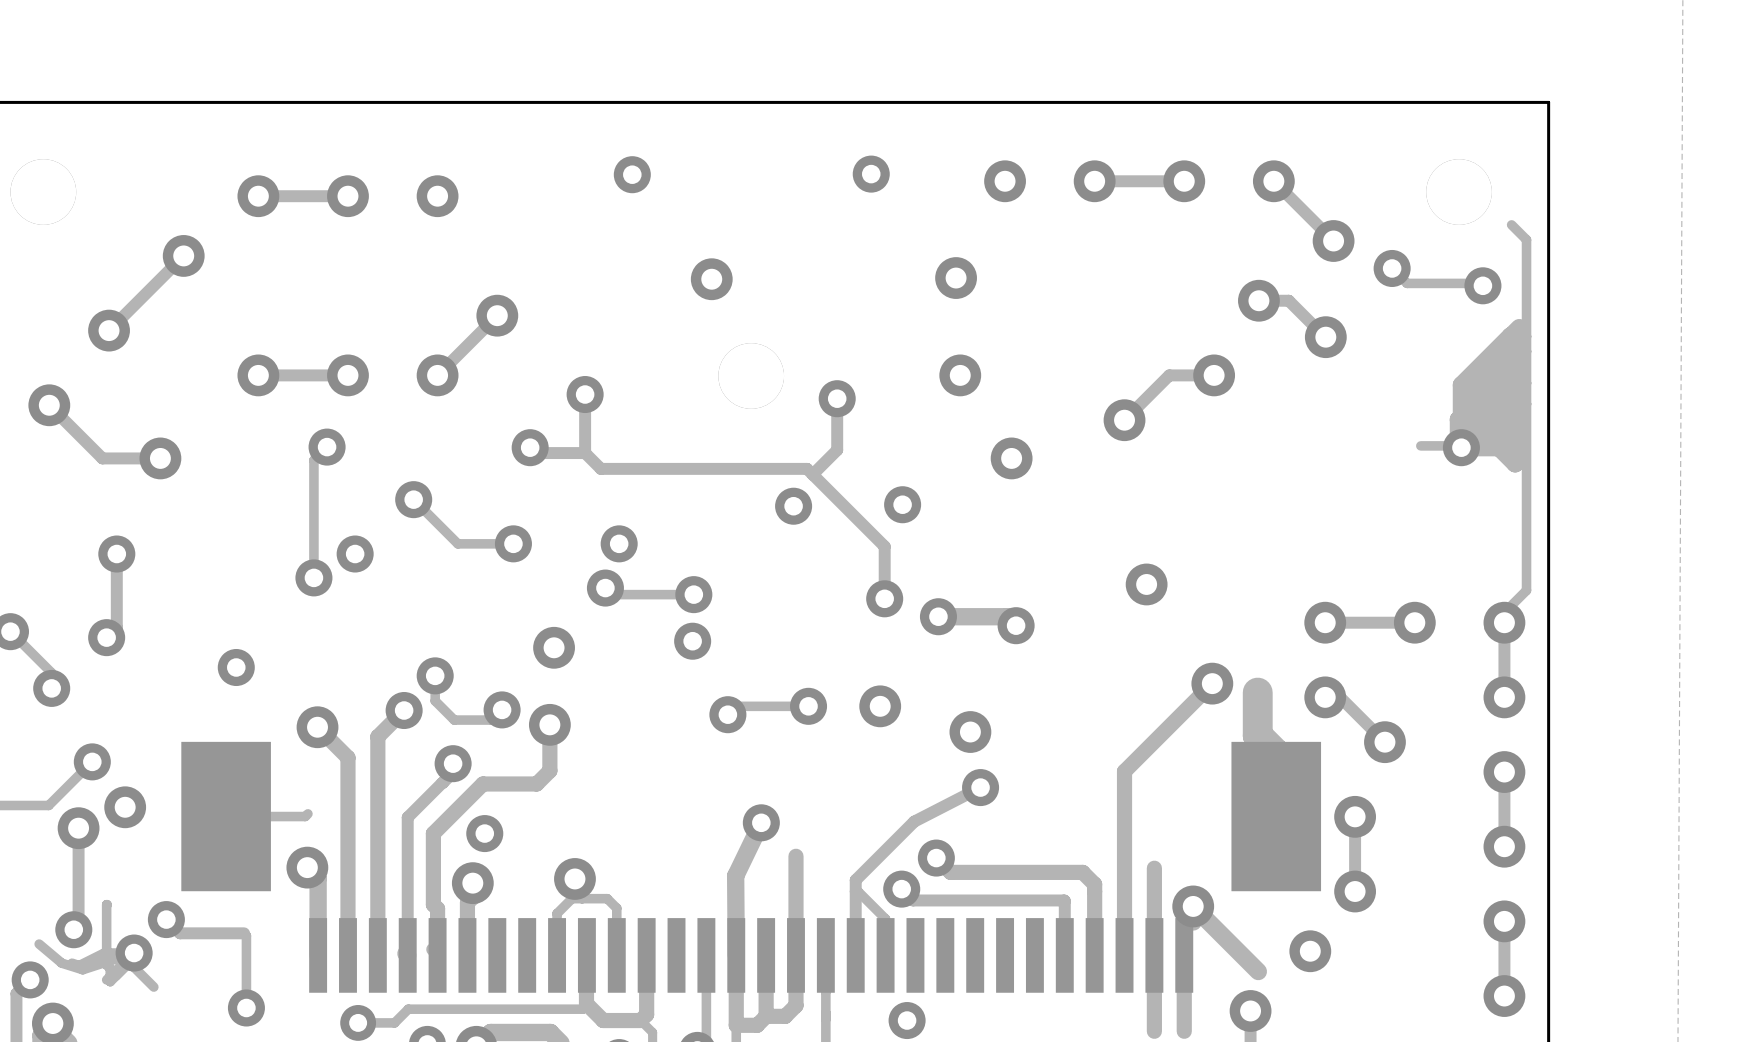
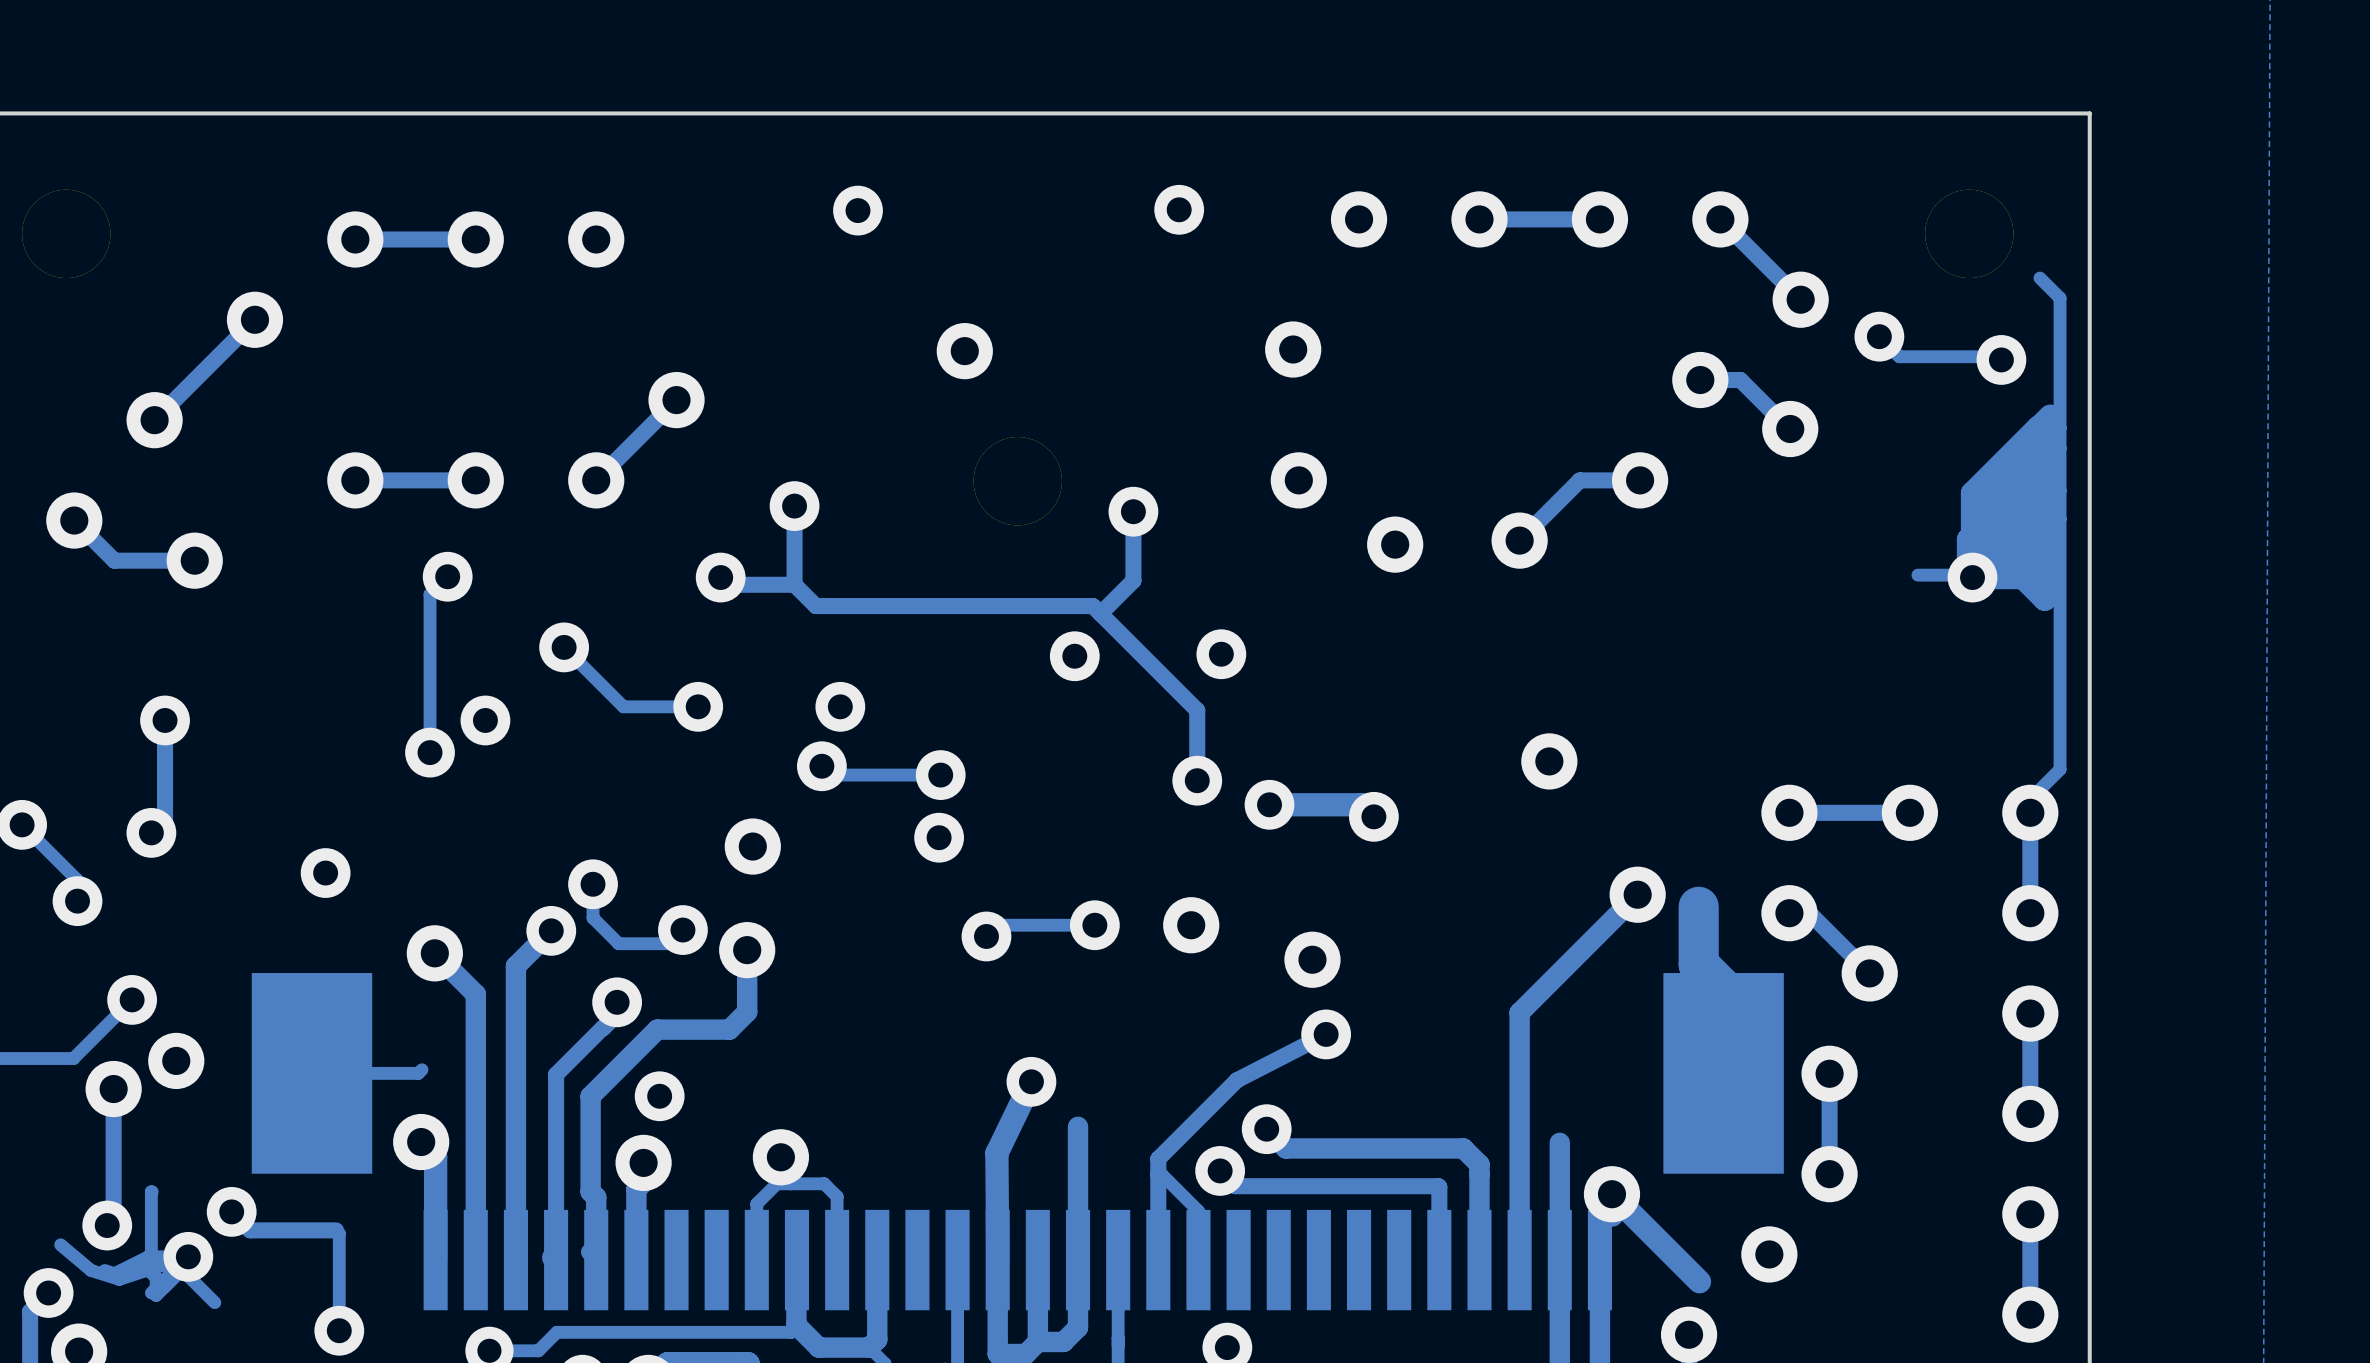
track: (79, 435) (102, 458) (160, 458) -> (114, 560) (194, 560)
via position: (160, 458) -> (194, 560)
via position: (1011, 458) -> (1395, 544)

